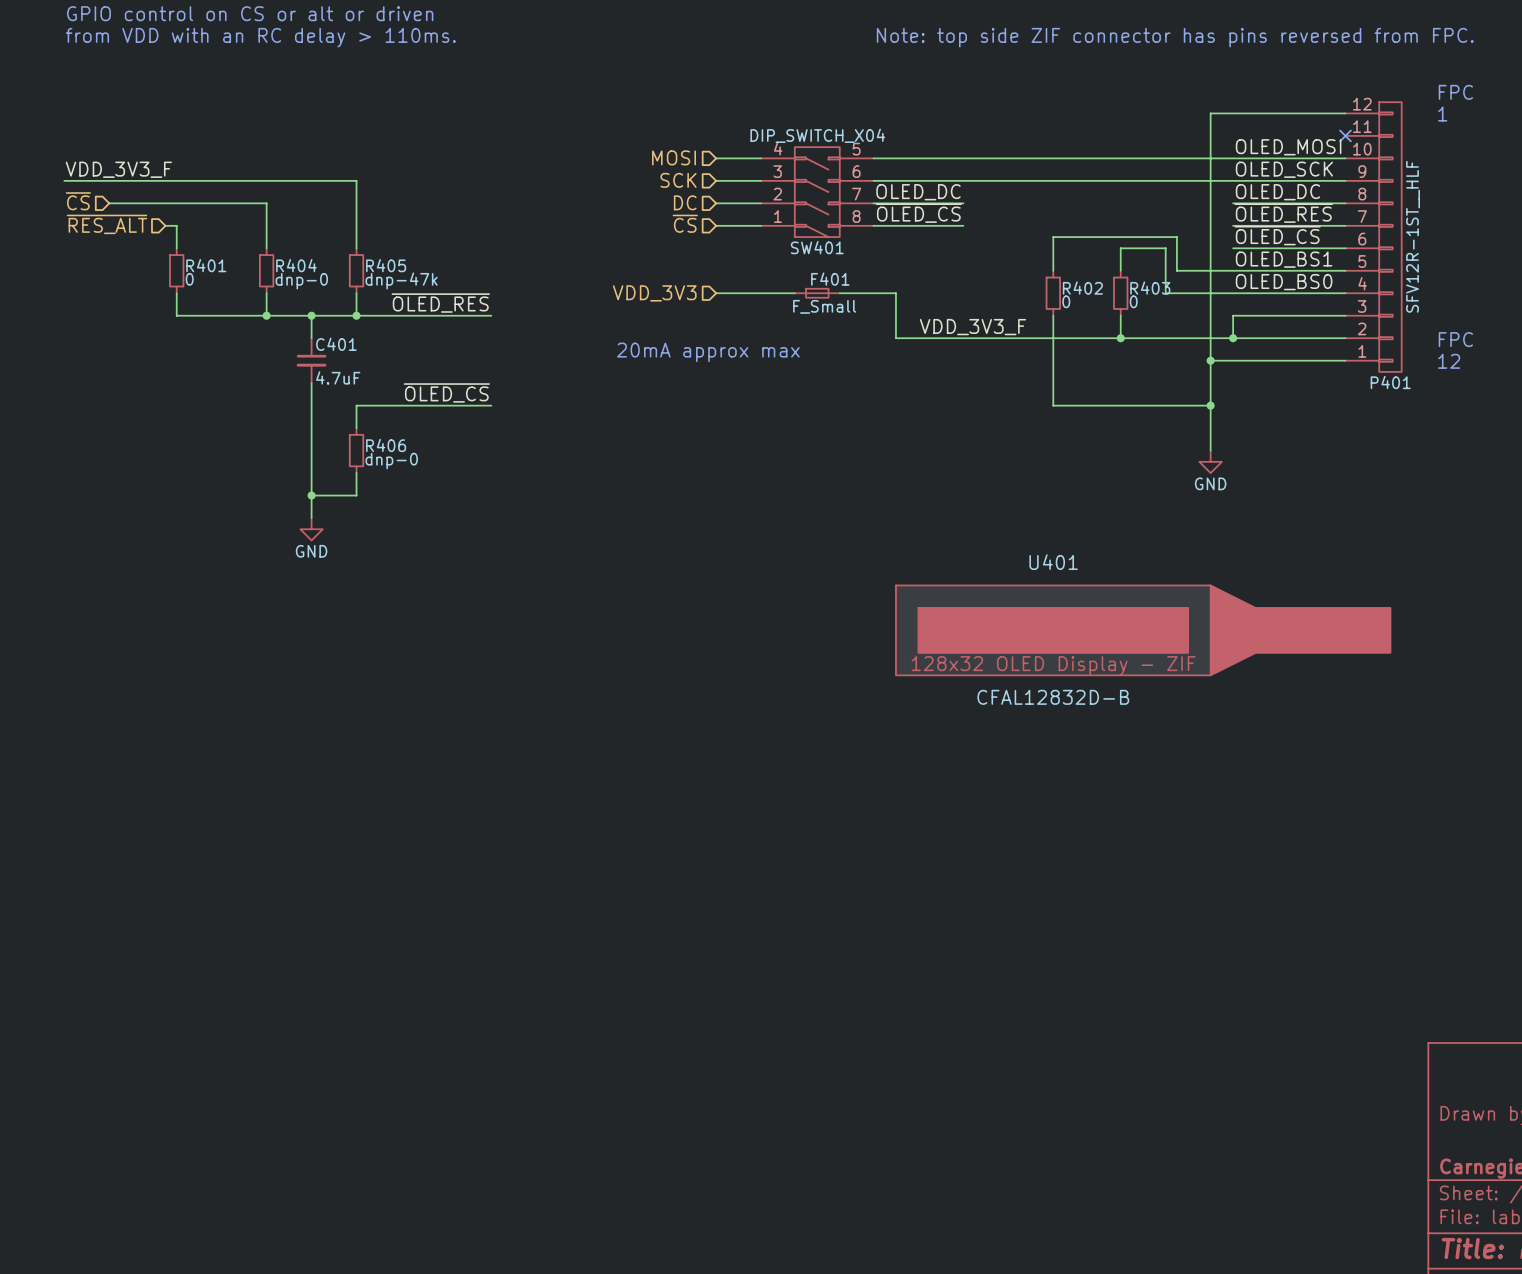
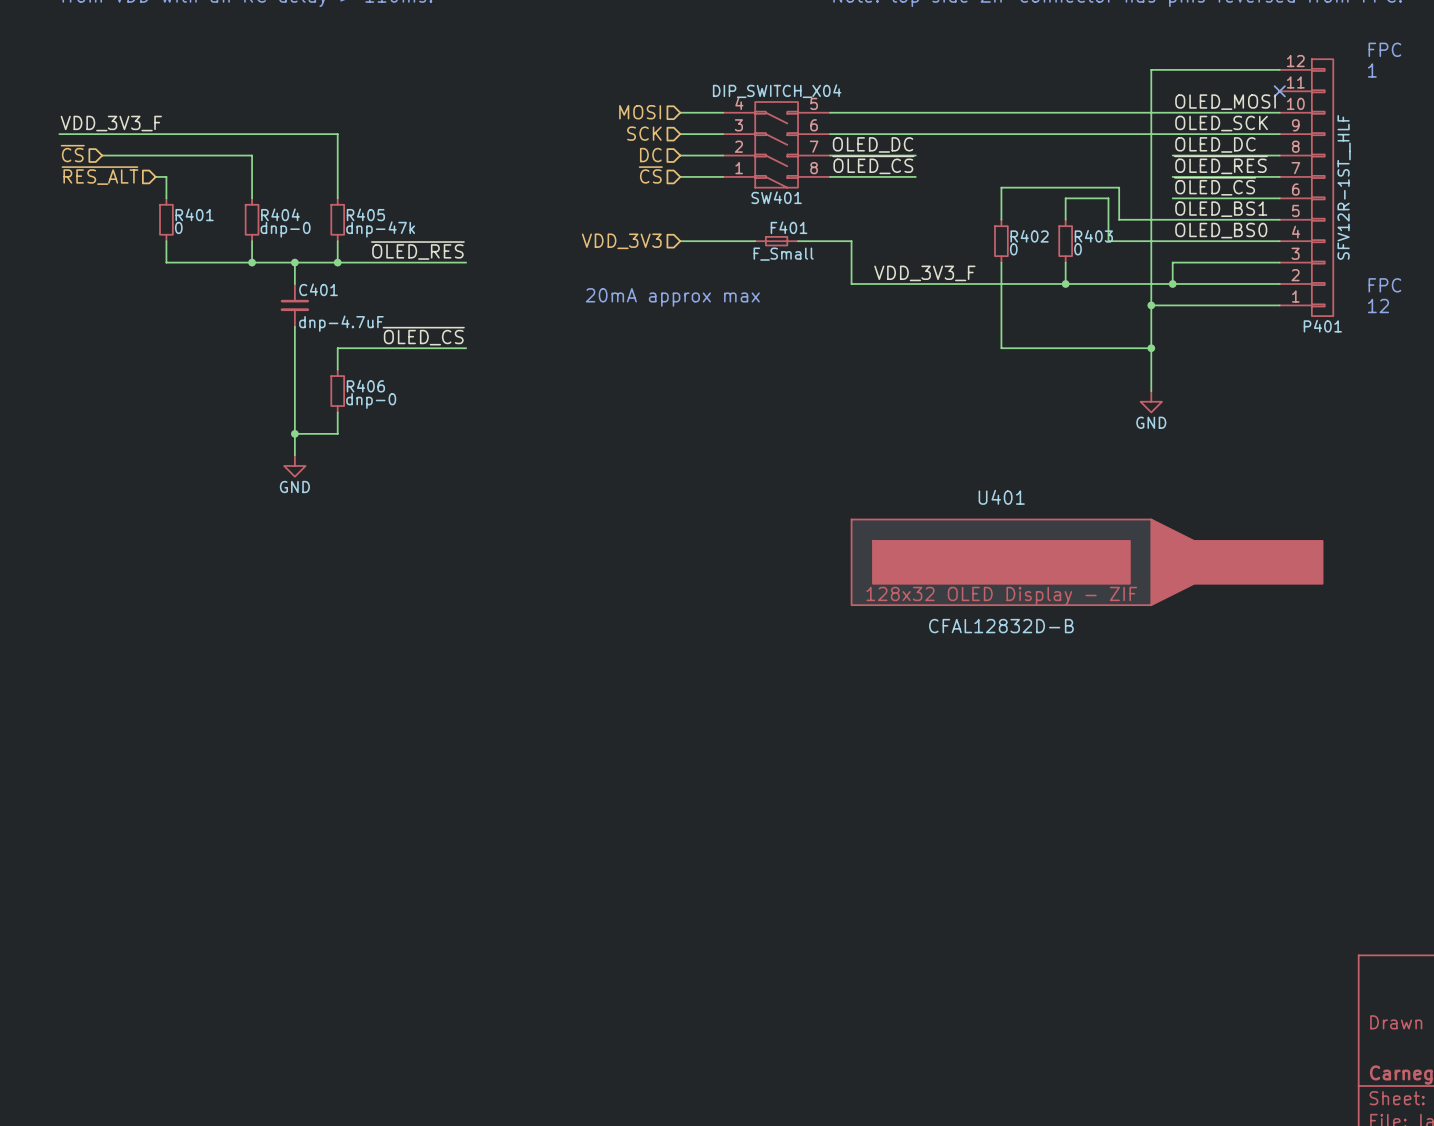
C401 value: 4.7uF (338, 377) -> dnp-4.7uF (341, 323)

